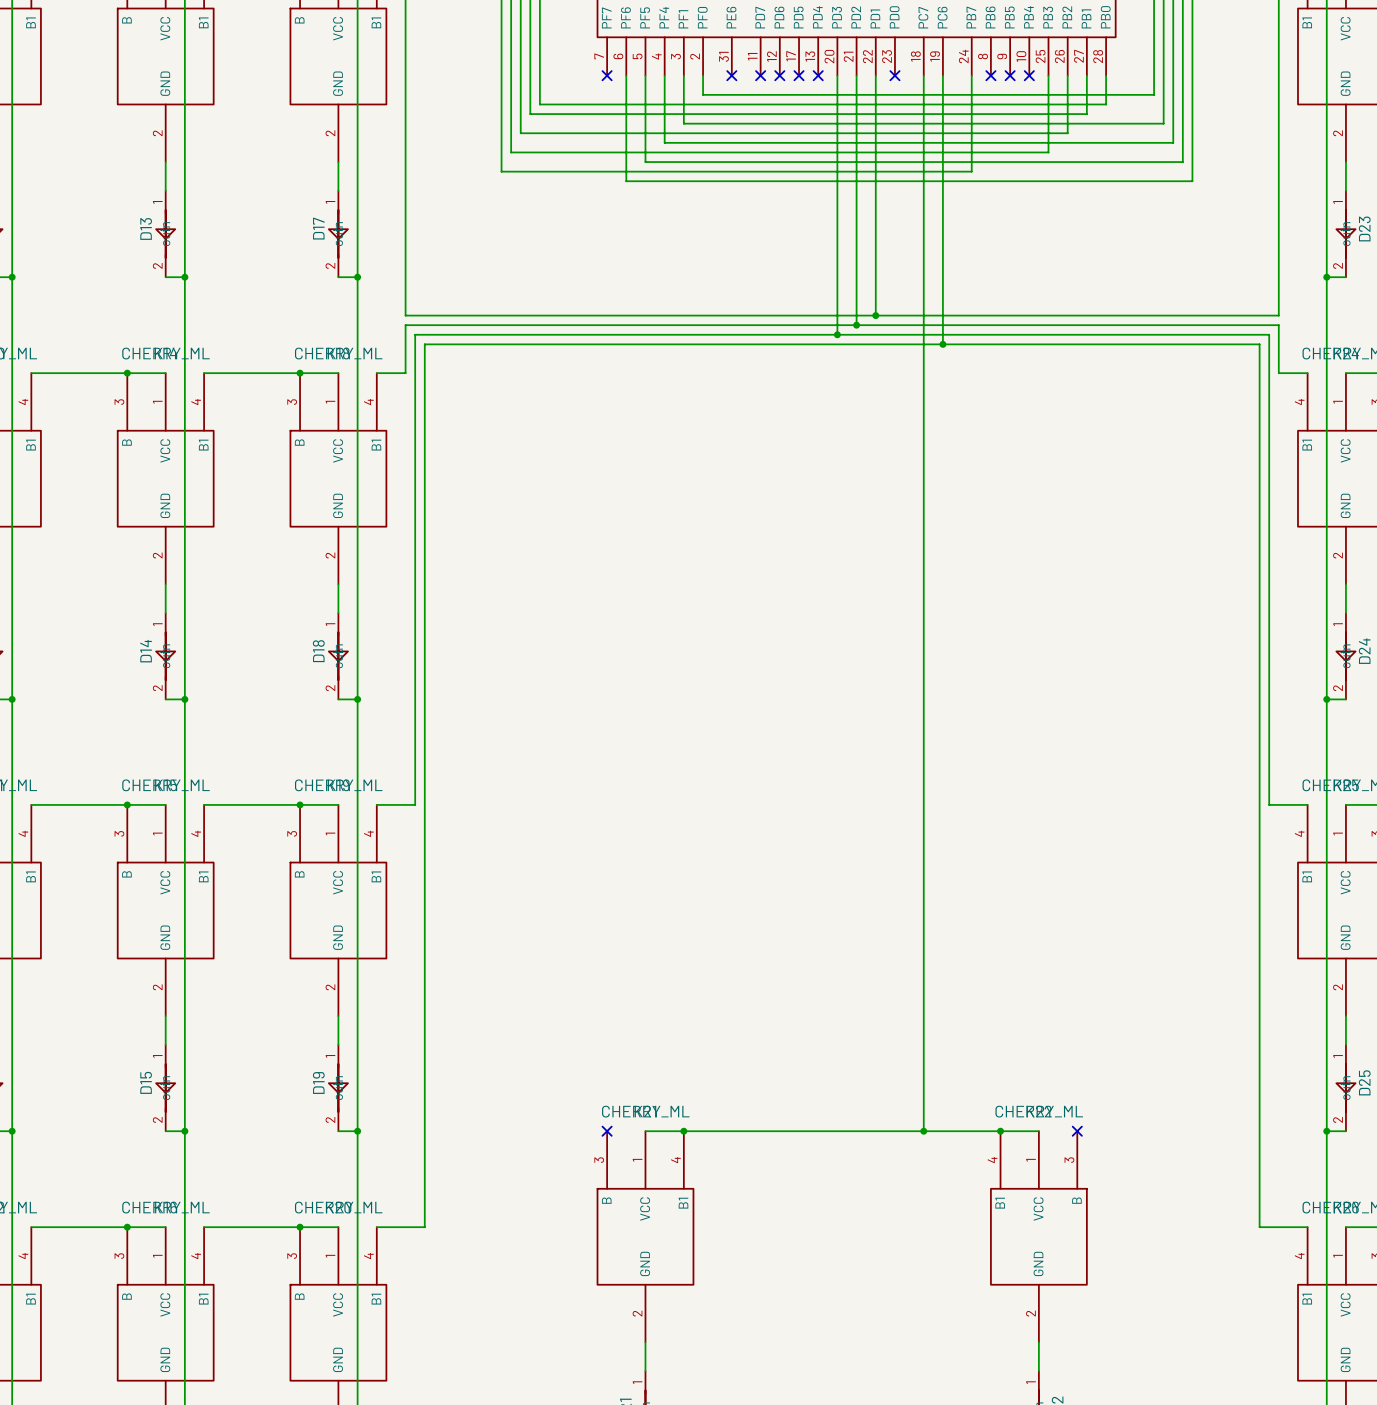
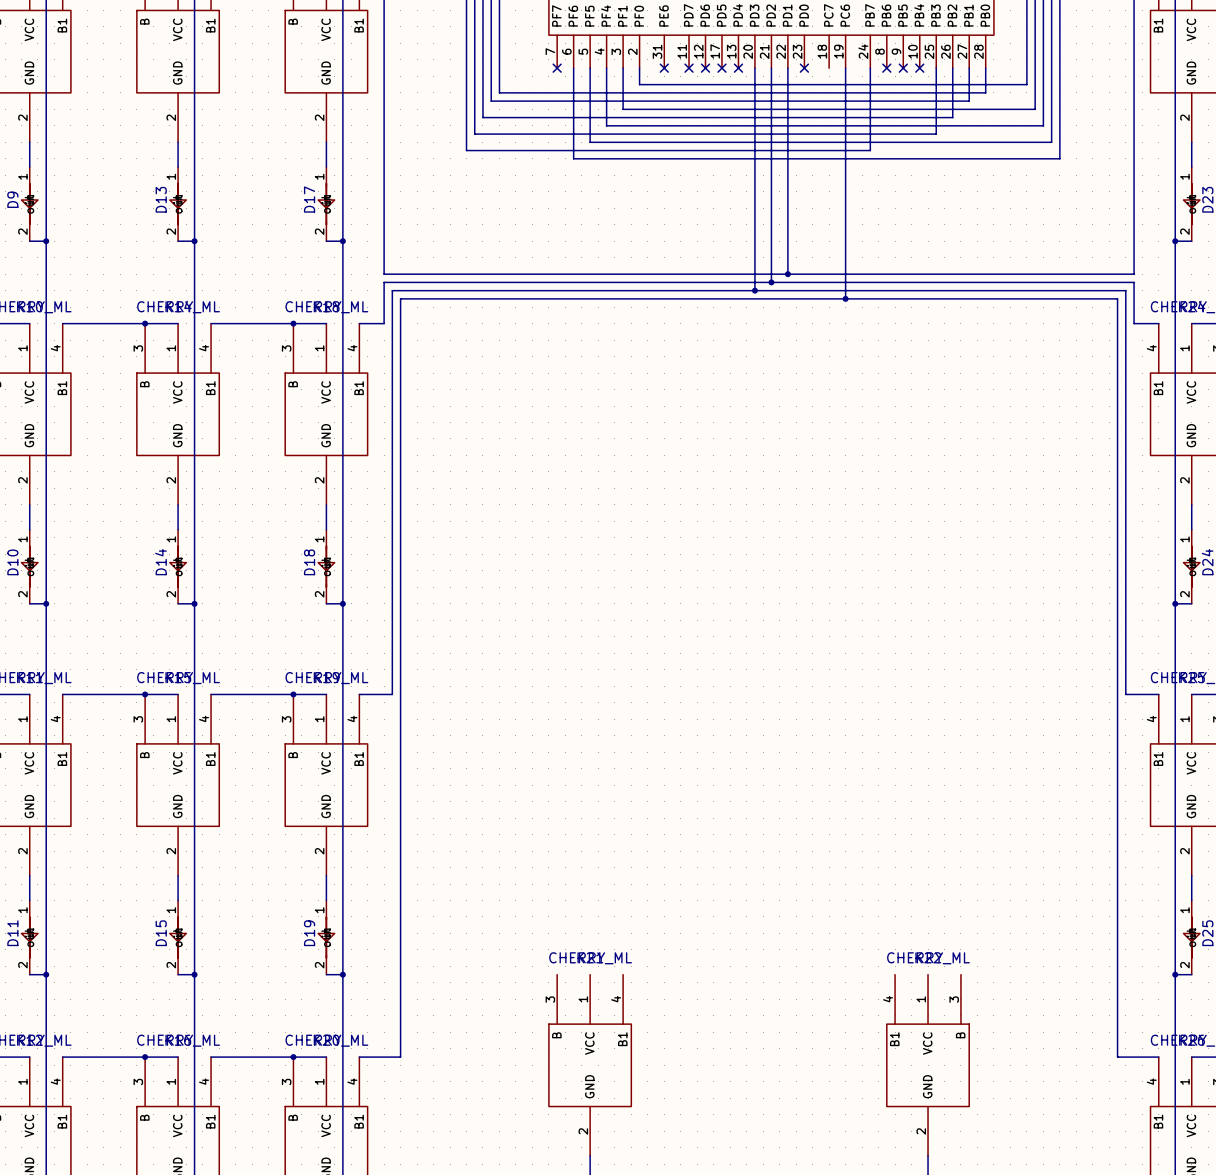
wire: (923, 75) (923, 1131) -> none
no-connect mark: (607, 1131) -> none
wire: (645, 1131) (1038, 1131) -> none
junction: (683, 1131) -> none
junction: (923, 1131) -> none
junction: (1000, 1131) -> none
no-connect mark: (1077, 1131) -> none

